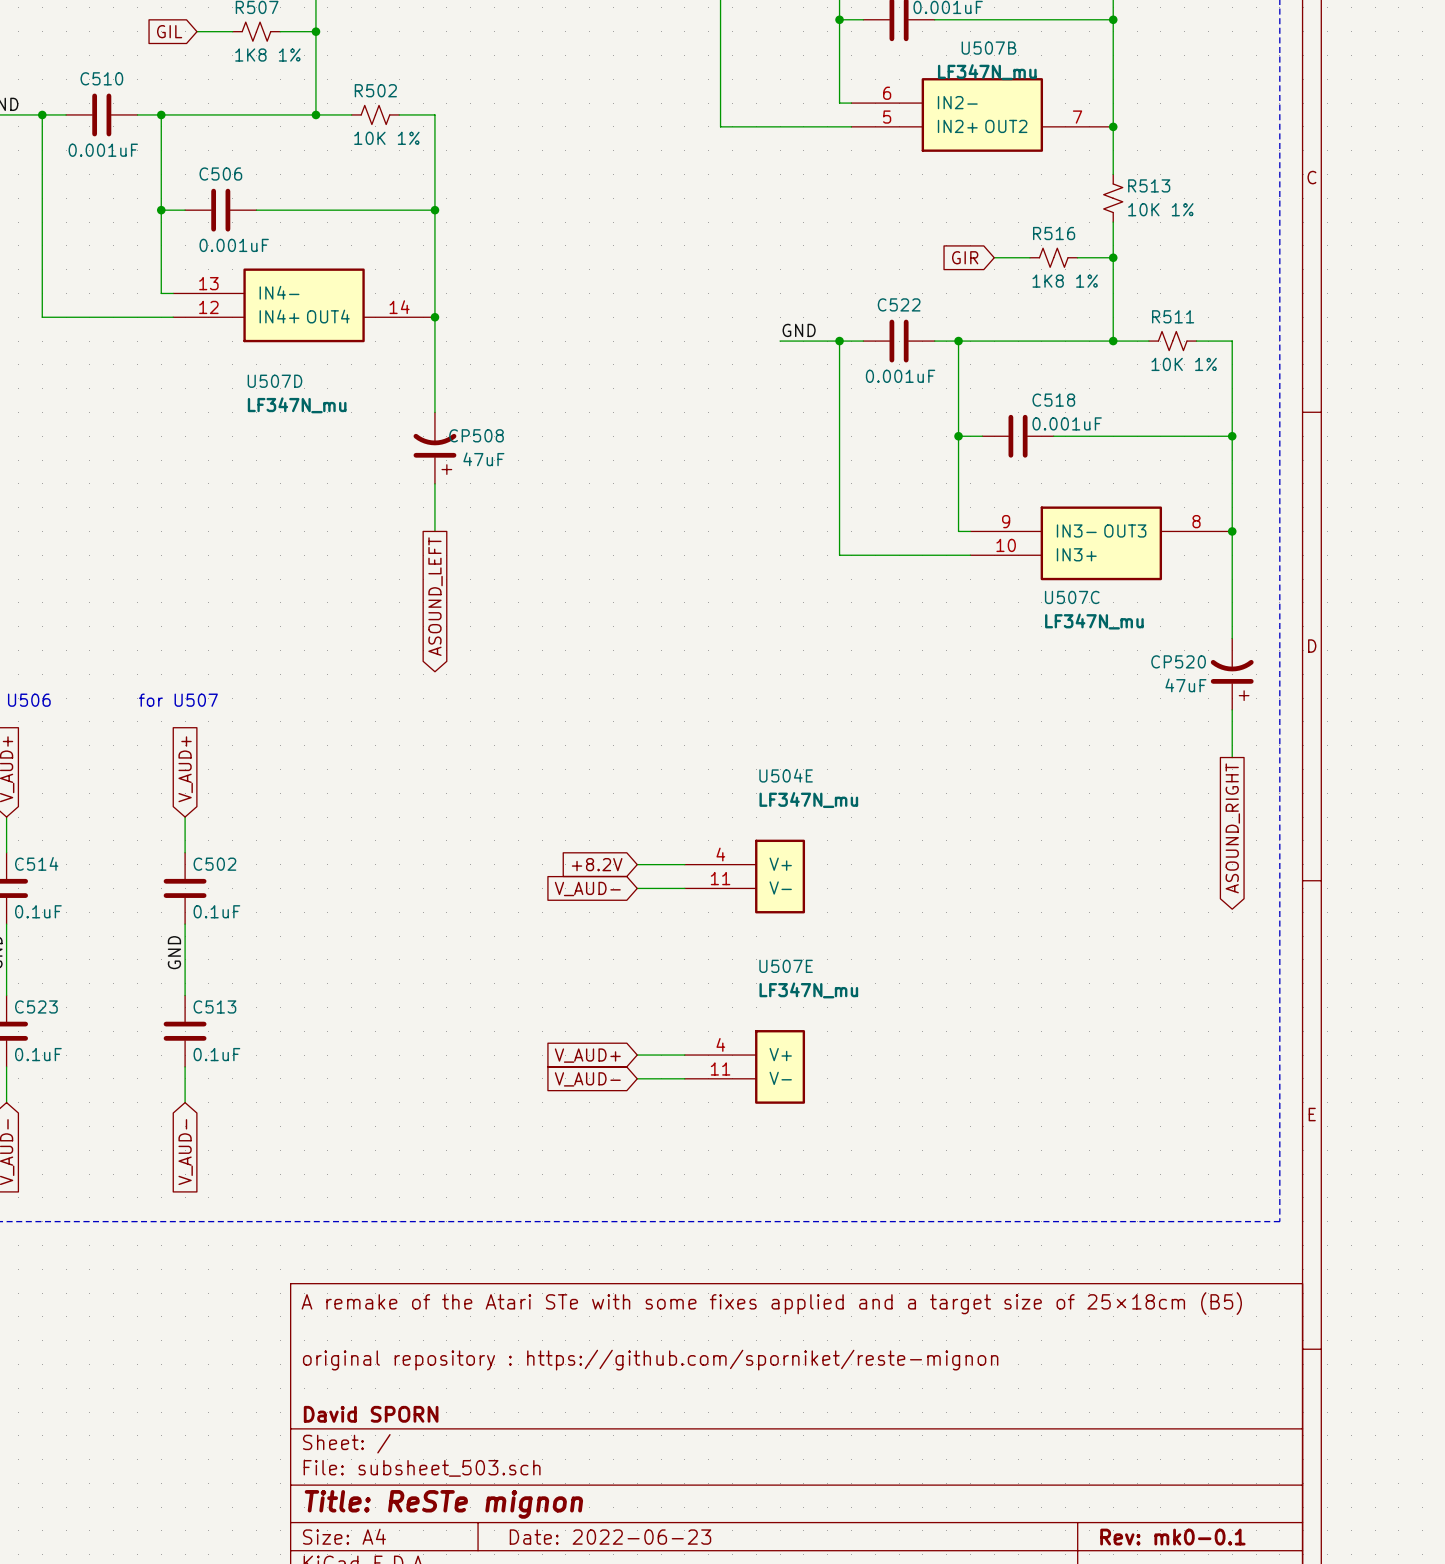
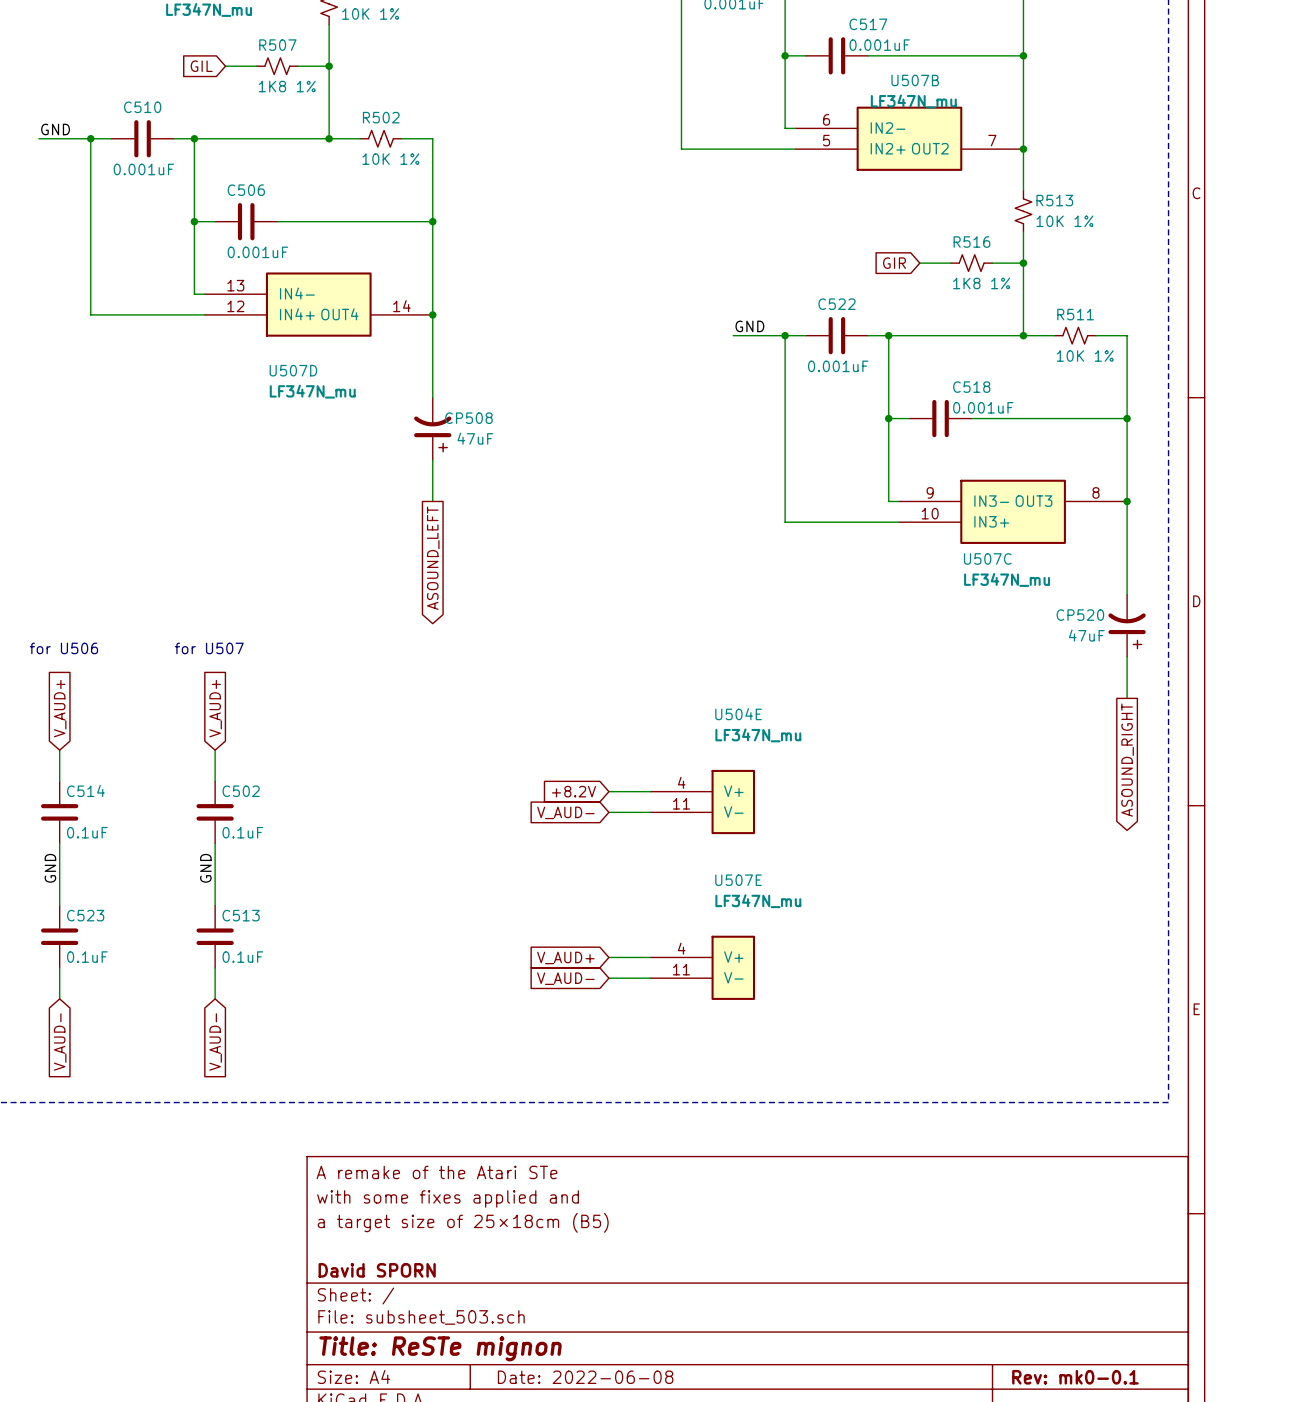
title block: A remake of the Atari STe with some fixes applied and a target size of 25×18cm (B5) (771, 1303) -> A remake of the Atari STe (436, 1172)
title block: none -> with some fixes applied and (448, 1198)
title block: original repository : https://github.com/sporniket/reste-mignon (650, 1360) -> a target size of 25×18cm (B5) (463, 1222)
title block: Date: 2022-06-23 (610, 1537) -> Date: 2022-06-08 (585, 1377)

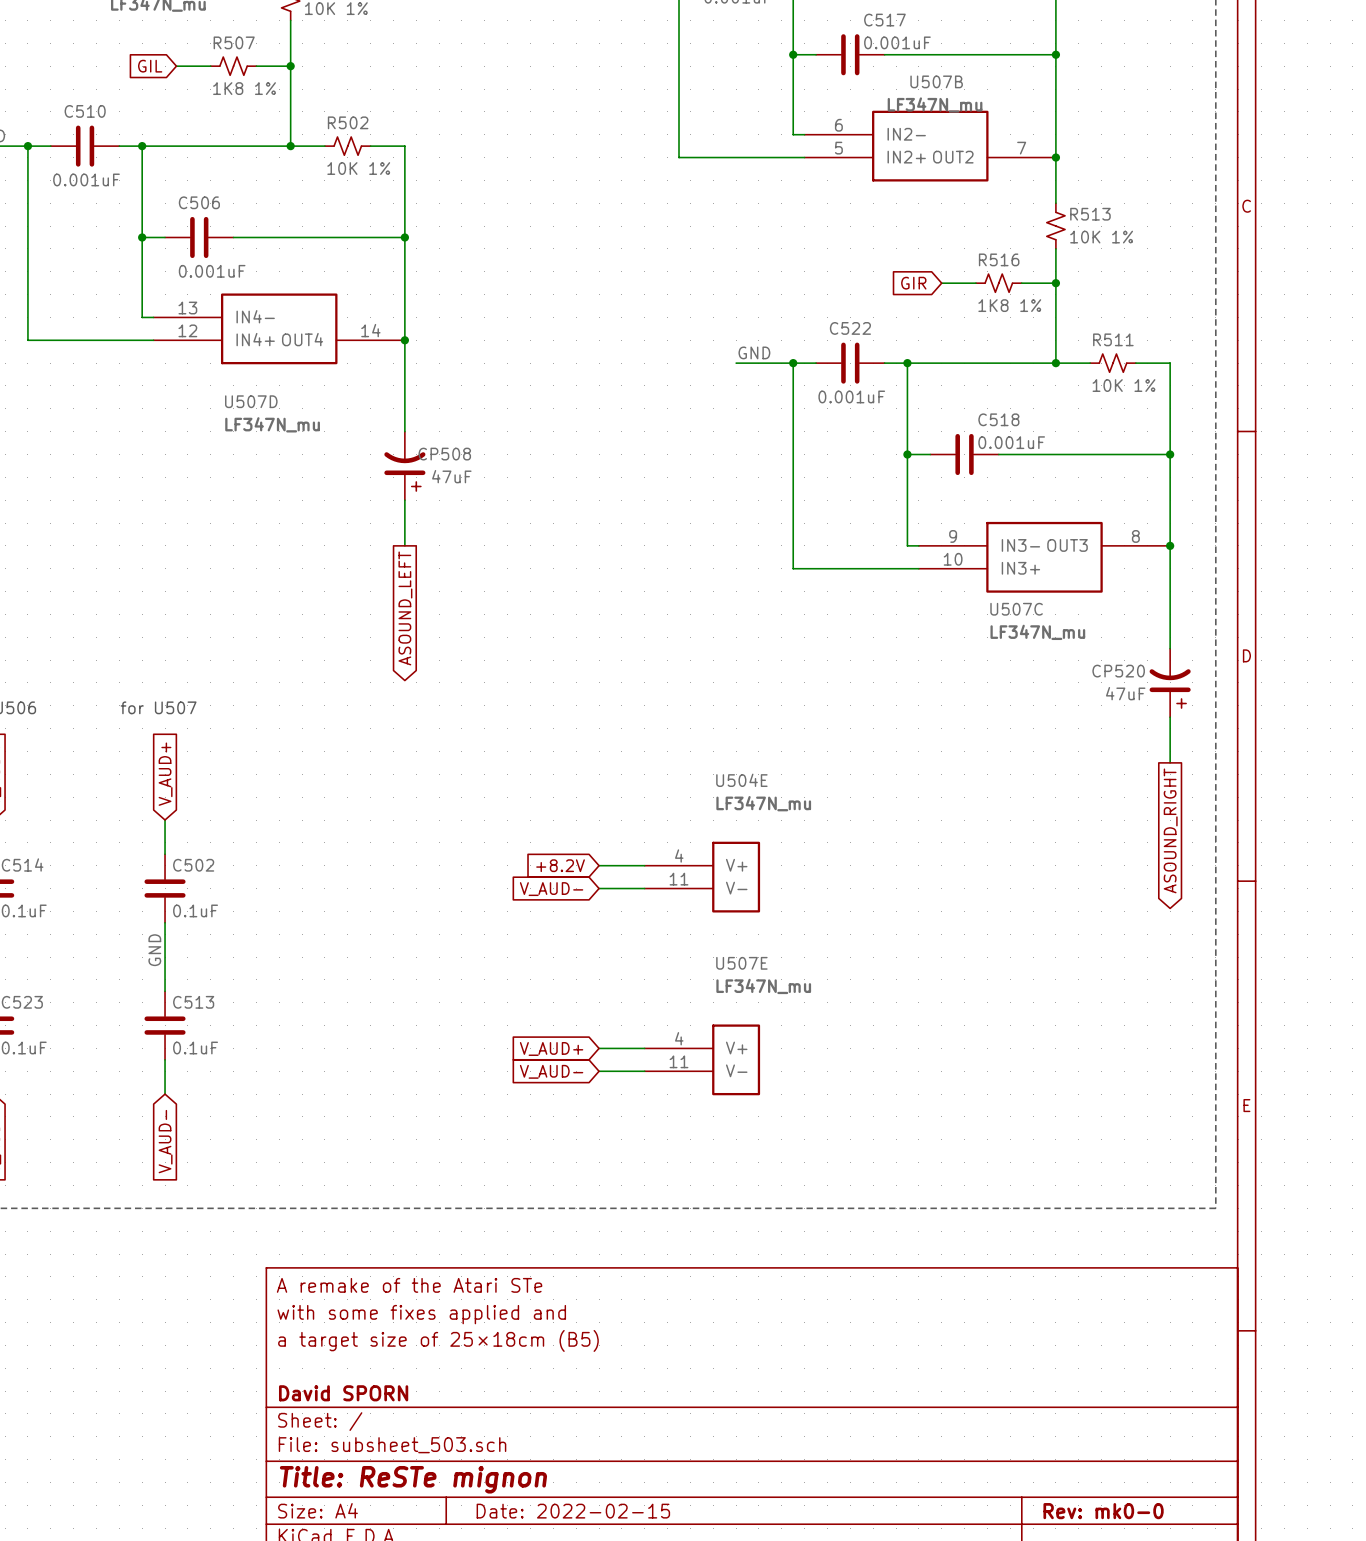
title block: Date: 2022-06-08 (585, 1377) -> Date: 2022-02-15 (573, 1511)
title block: Rev: mk0-0.1 (1075, 1377) -> Rev: mk0-0 (1103, 1511)

